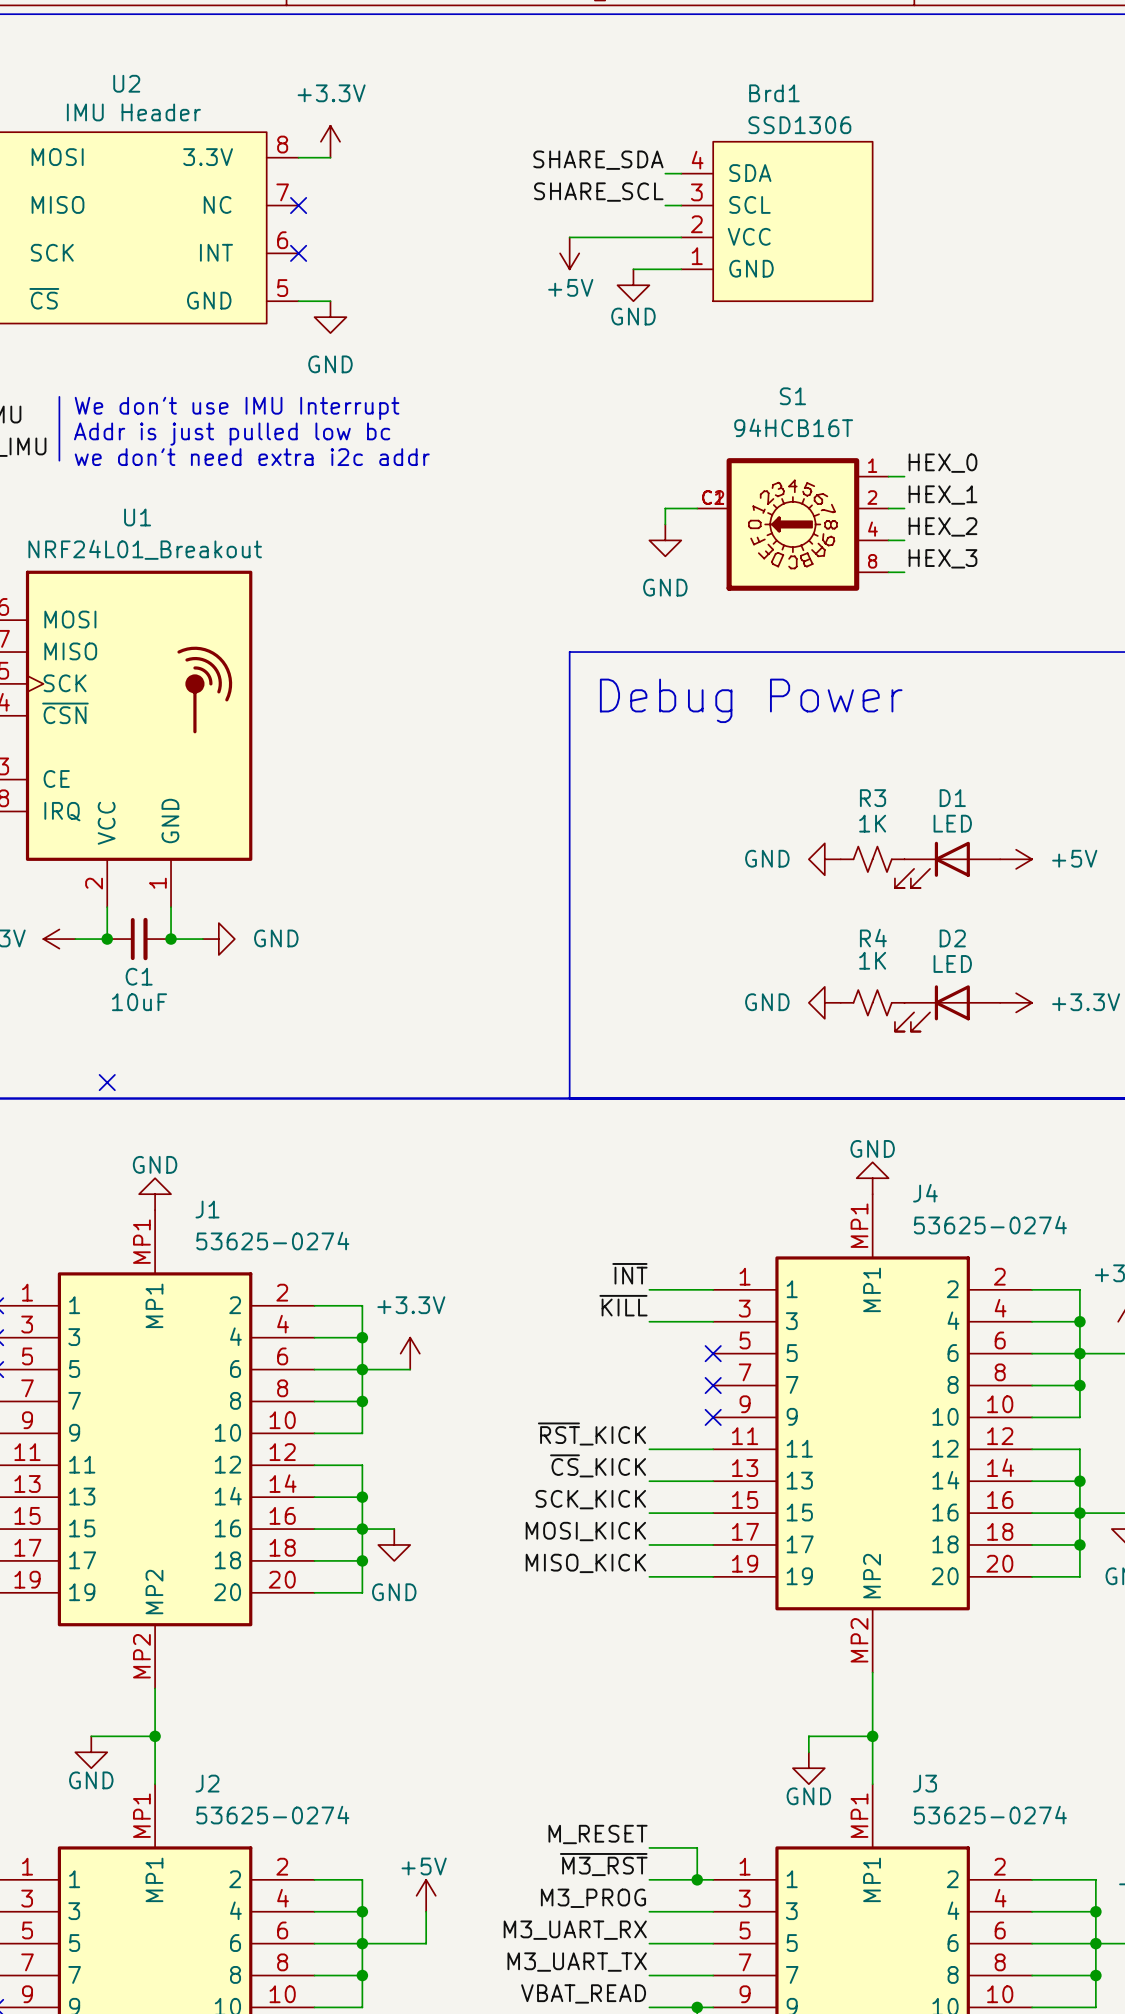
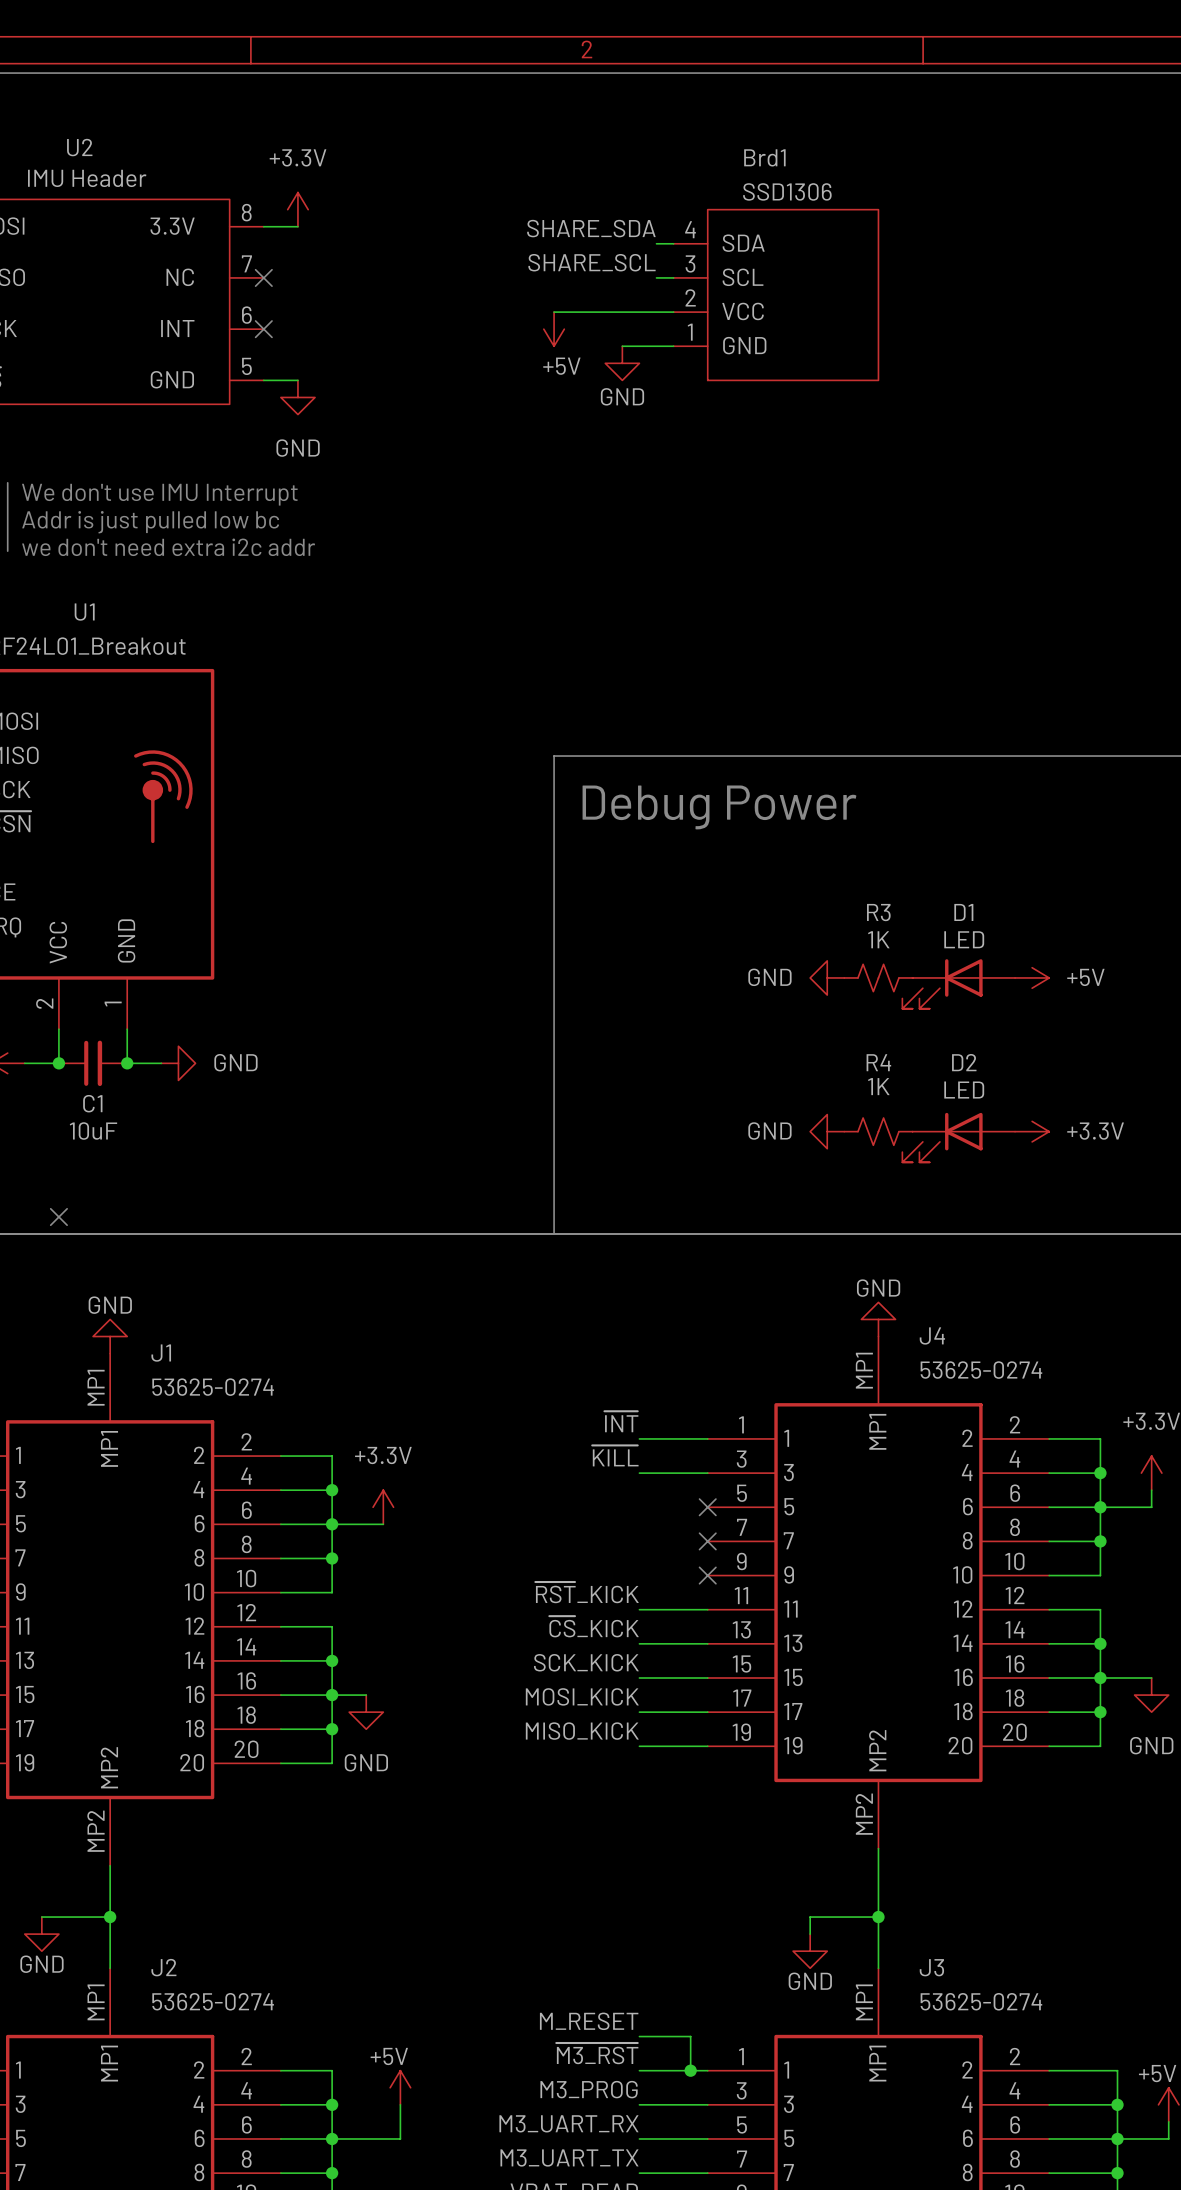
label: HEX_0 (942, 463) -> none
wire: (888, 476) (904, 476) -> none
label: HEX_1 (942, 495) -> none
wire: (697, 508) (665, 508) (665, 524) -> none
wire: (888, 508) (904, 508) -> none
S1: 94HCB16T (792, 524) -> none
label: HEX_2 (942, 526) -> none
power symbol: GND (665, 540) -> none
wire: (888, 540) (904, 540) -> none
label: HEX_3 (942, 558) -> none
wire: (888, 572) (904, 572) -> none

